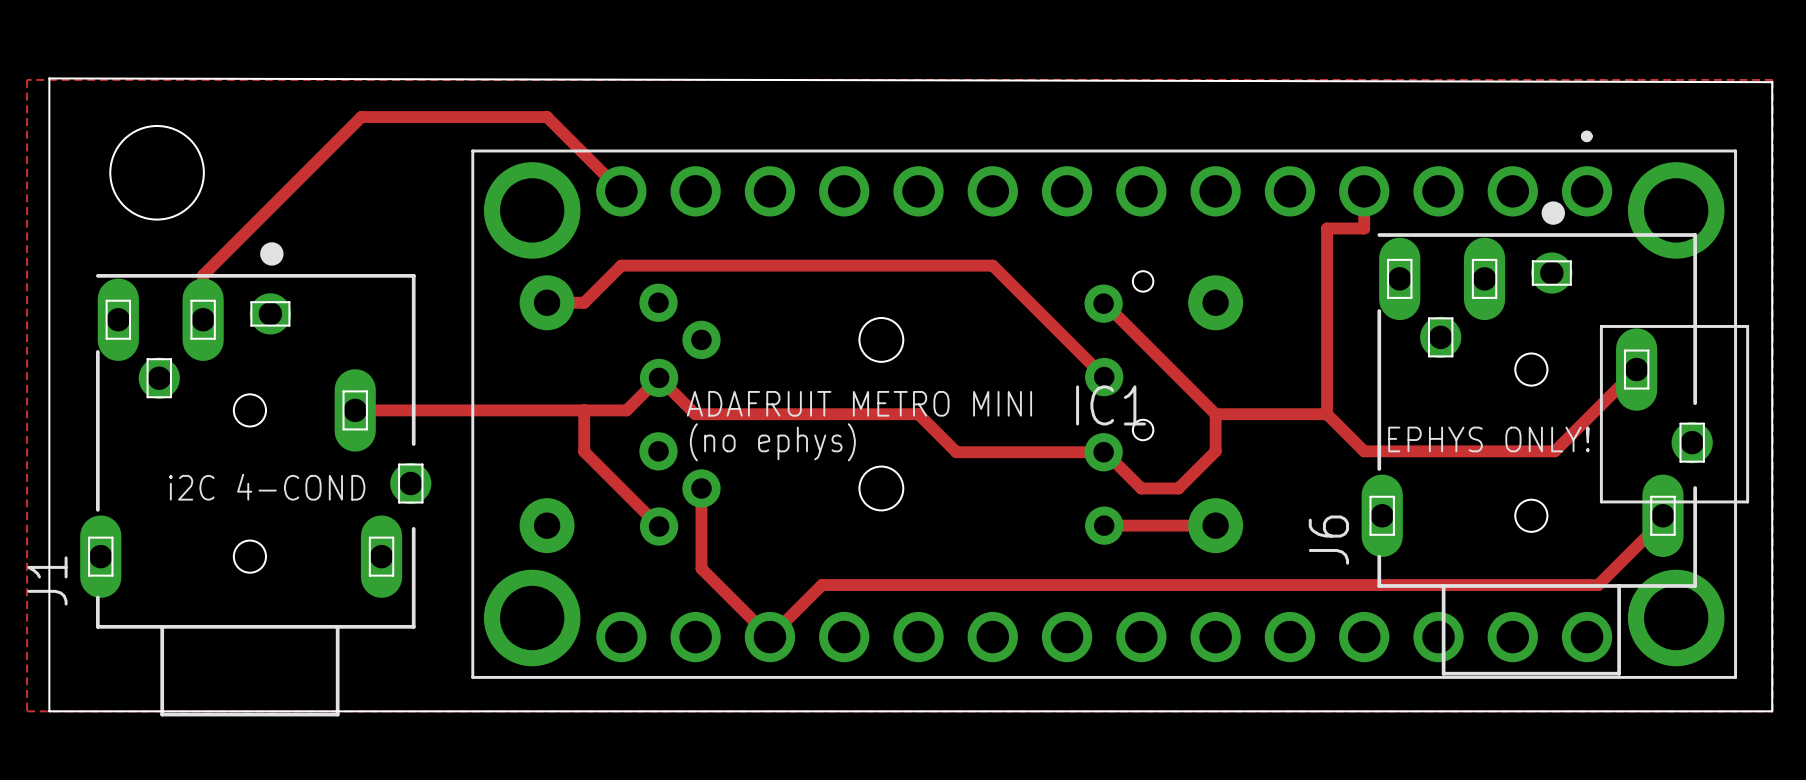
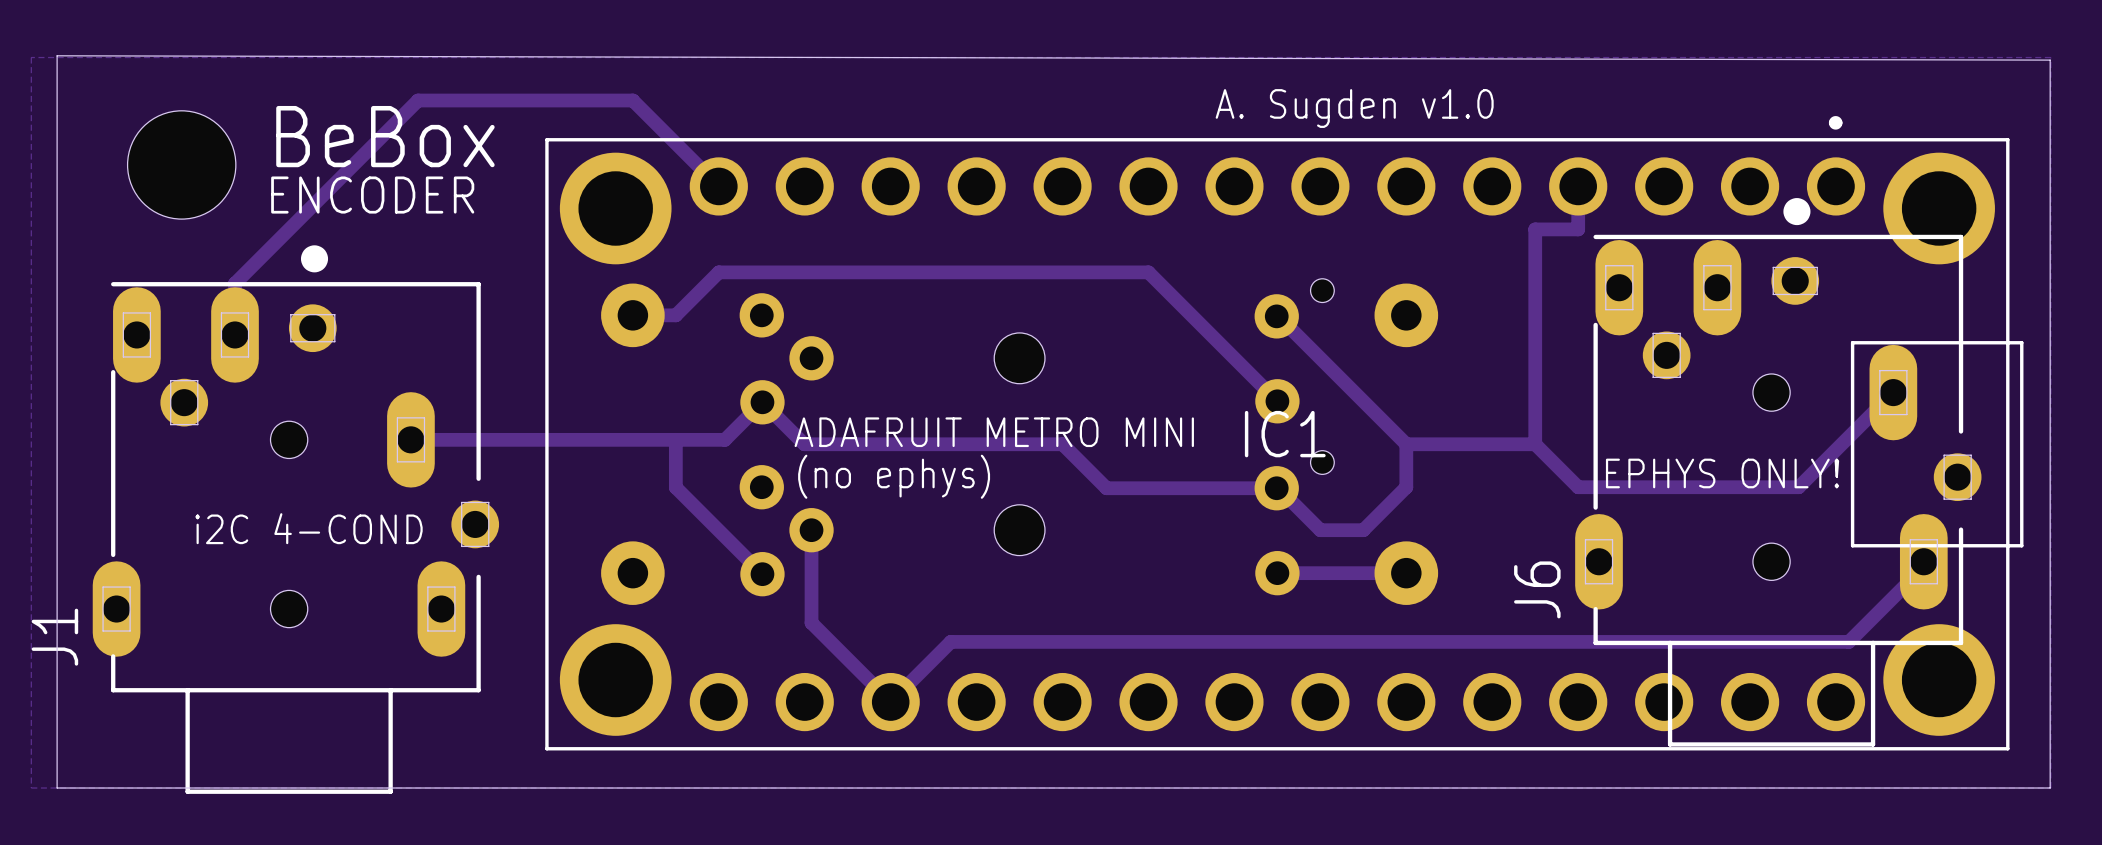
text: none -> A. Sugden v1.0 (1354, 108)
text: none -> BeBox (385, 136)
text: none -> ENCODER (372, 195)

